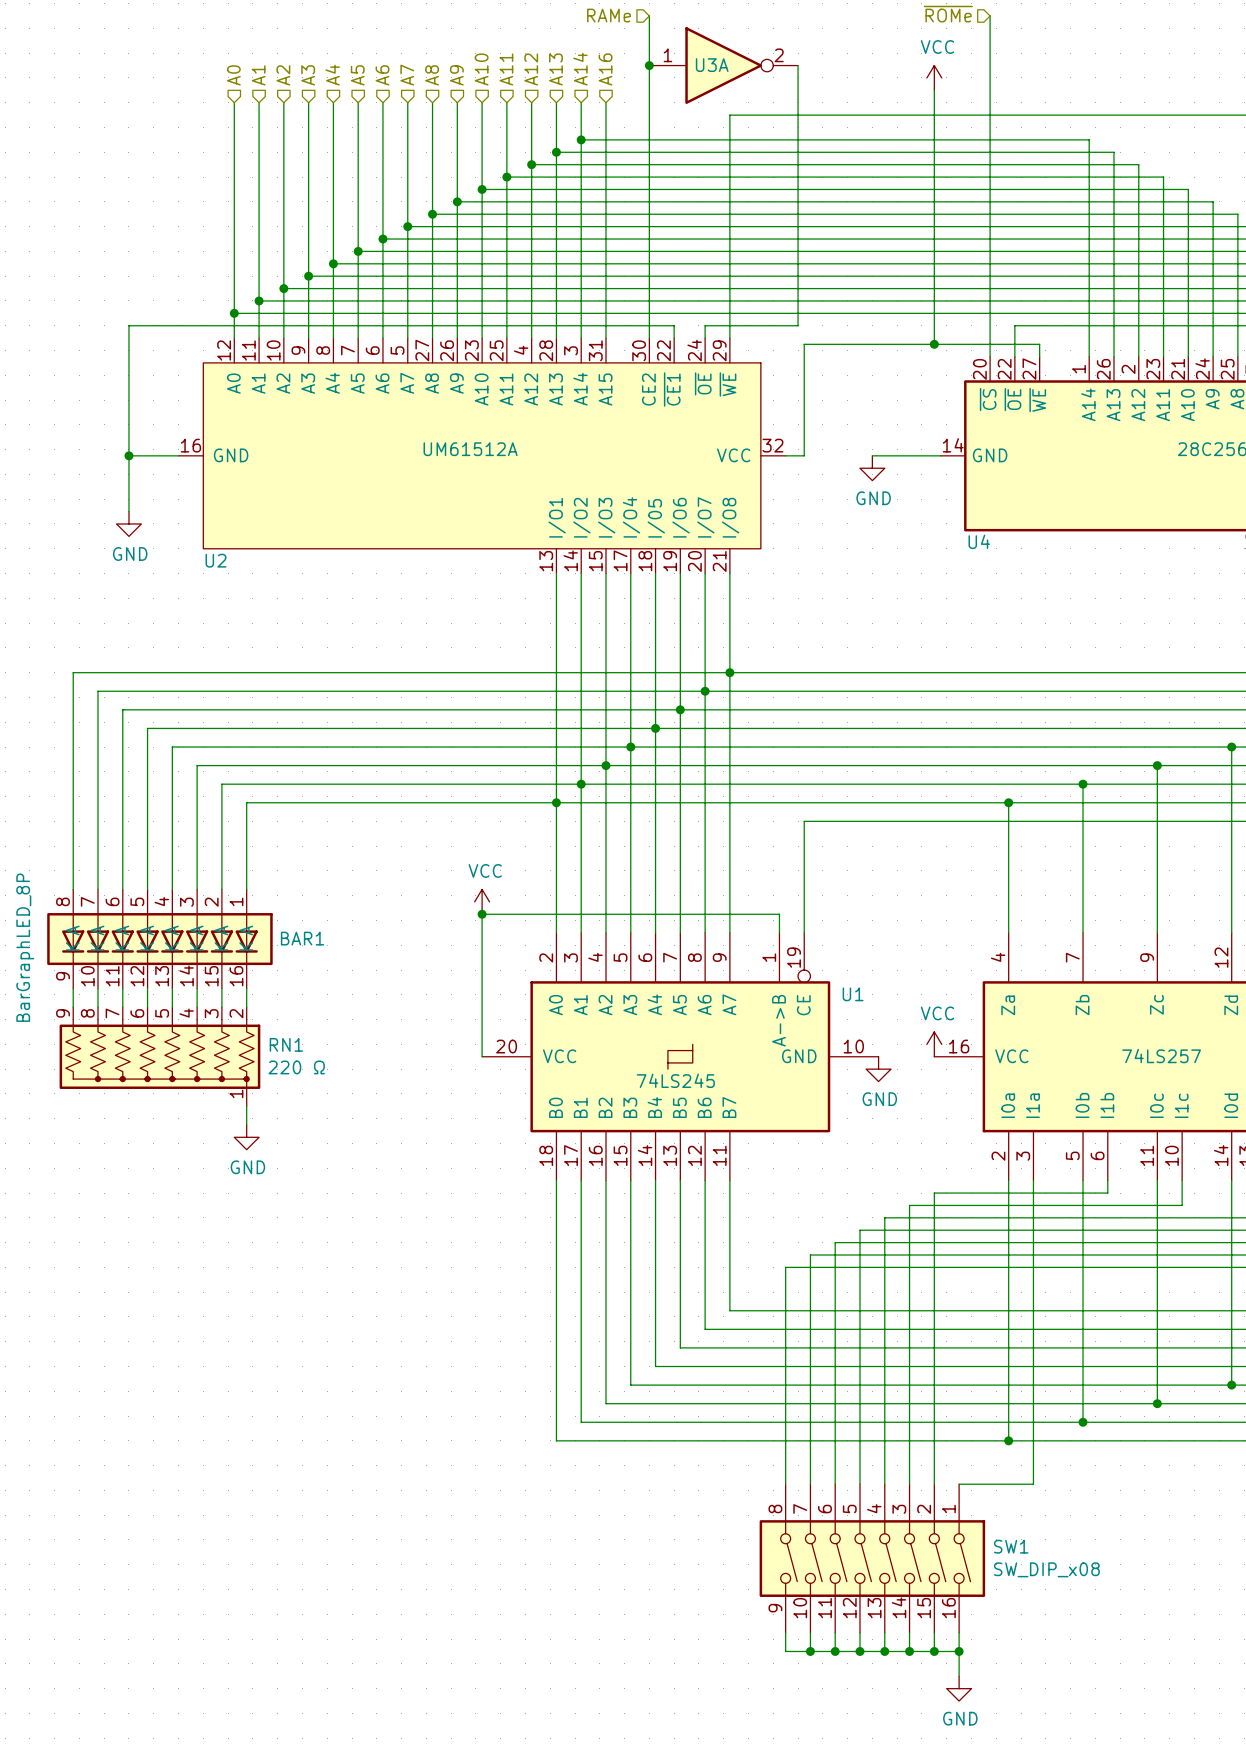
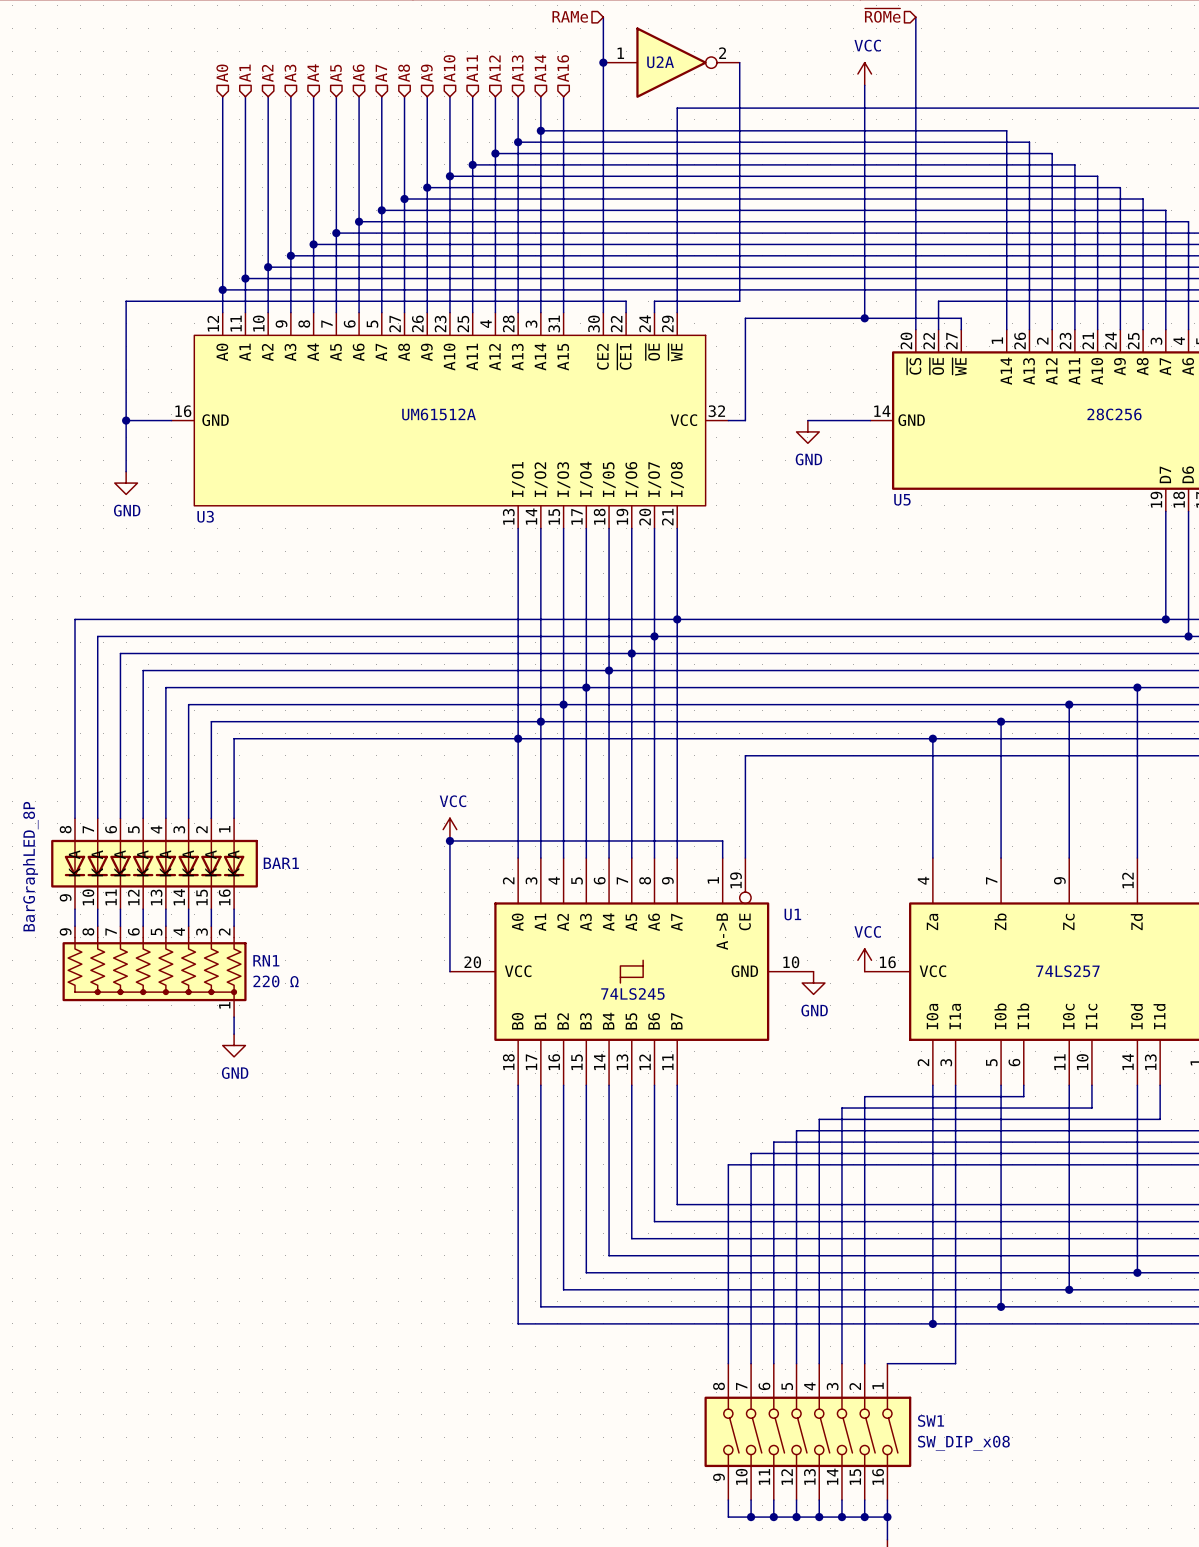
U3A name: U3A (712, 65) -> U2A (660, 62)
U4 name: U4 (979, 541) -> U5 (902, 499)
U2 name: U2 (216, 560) -> U3 (205, 516)

